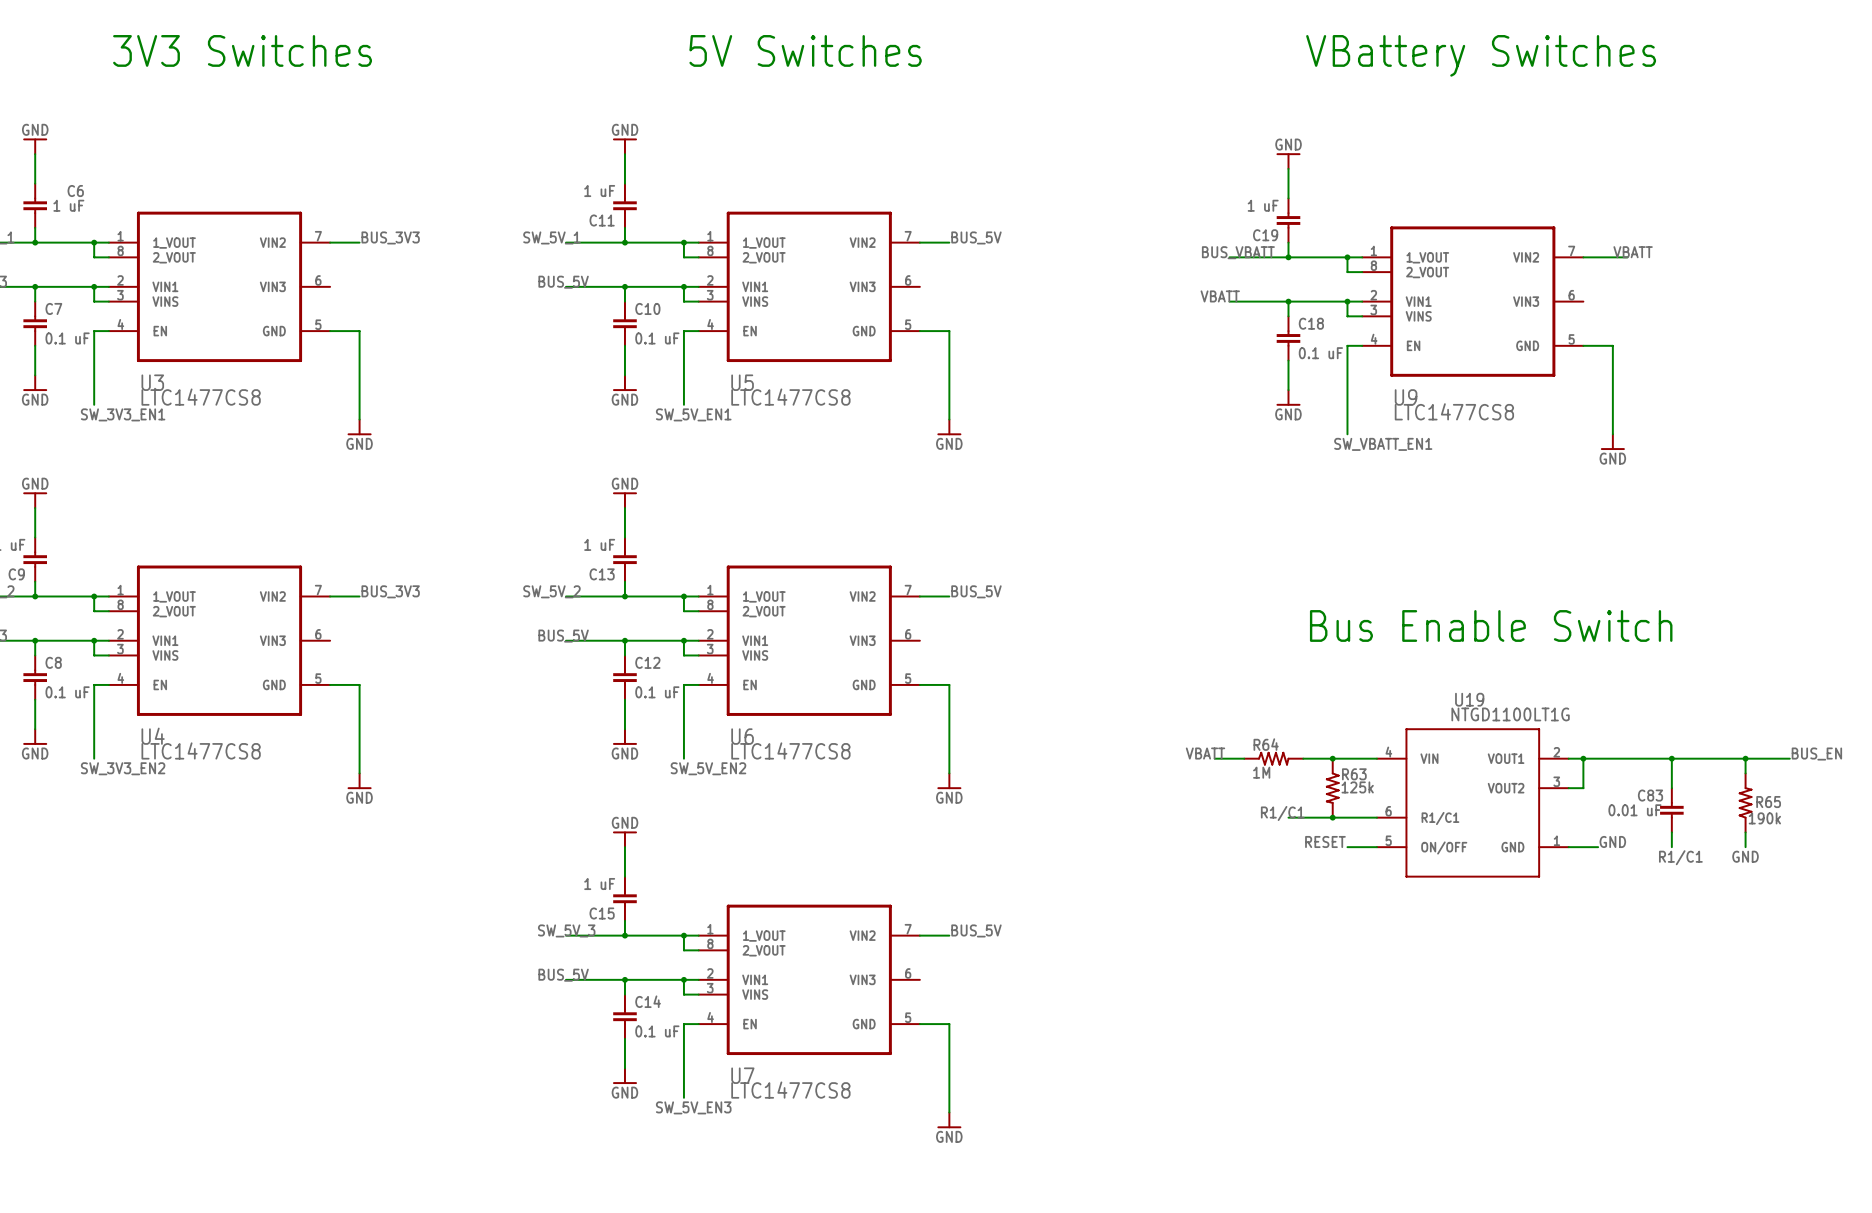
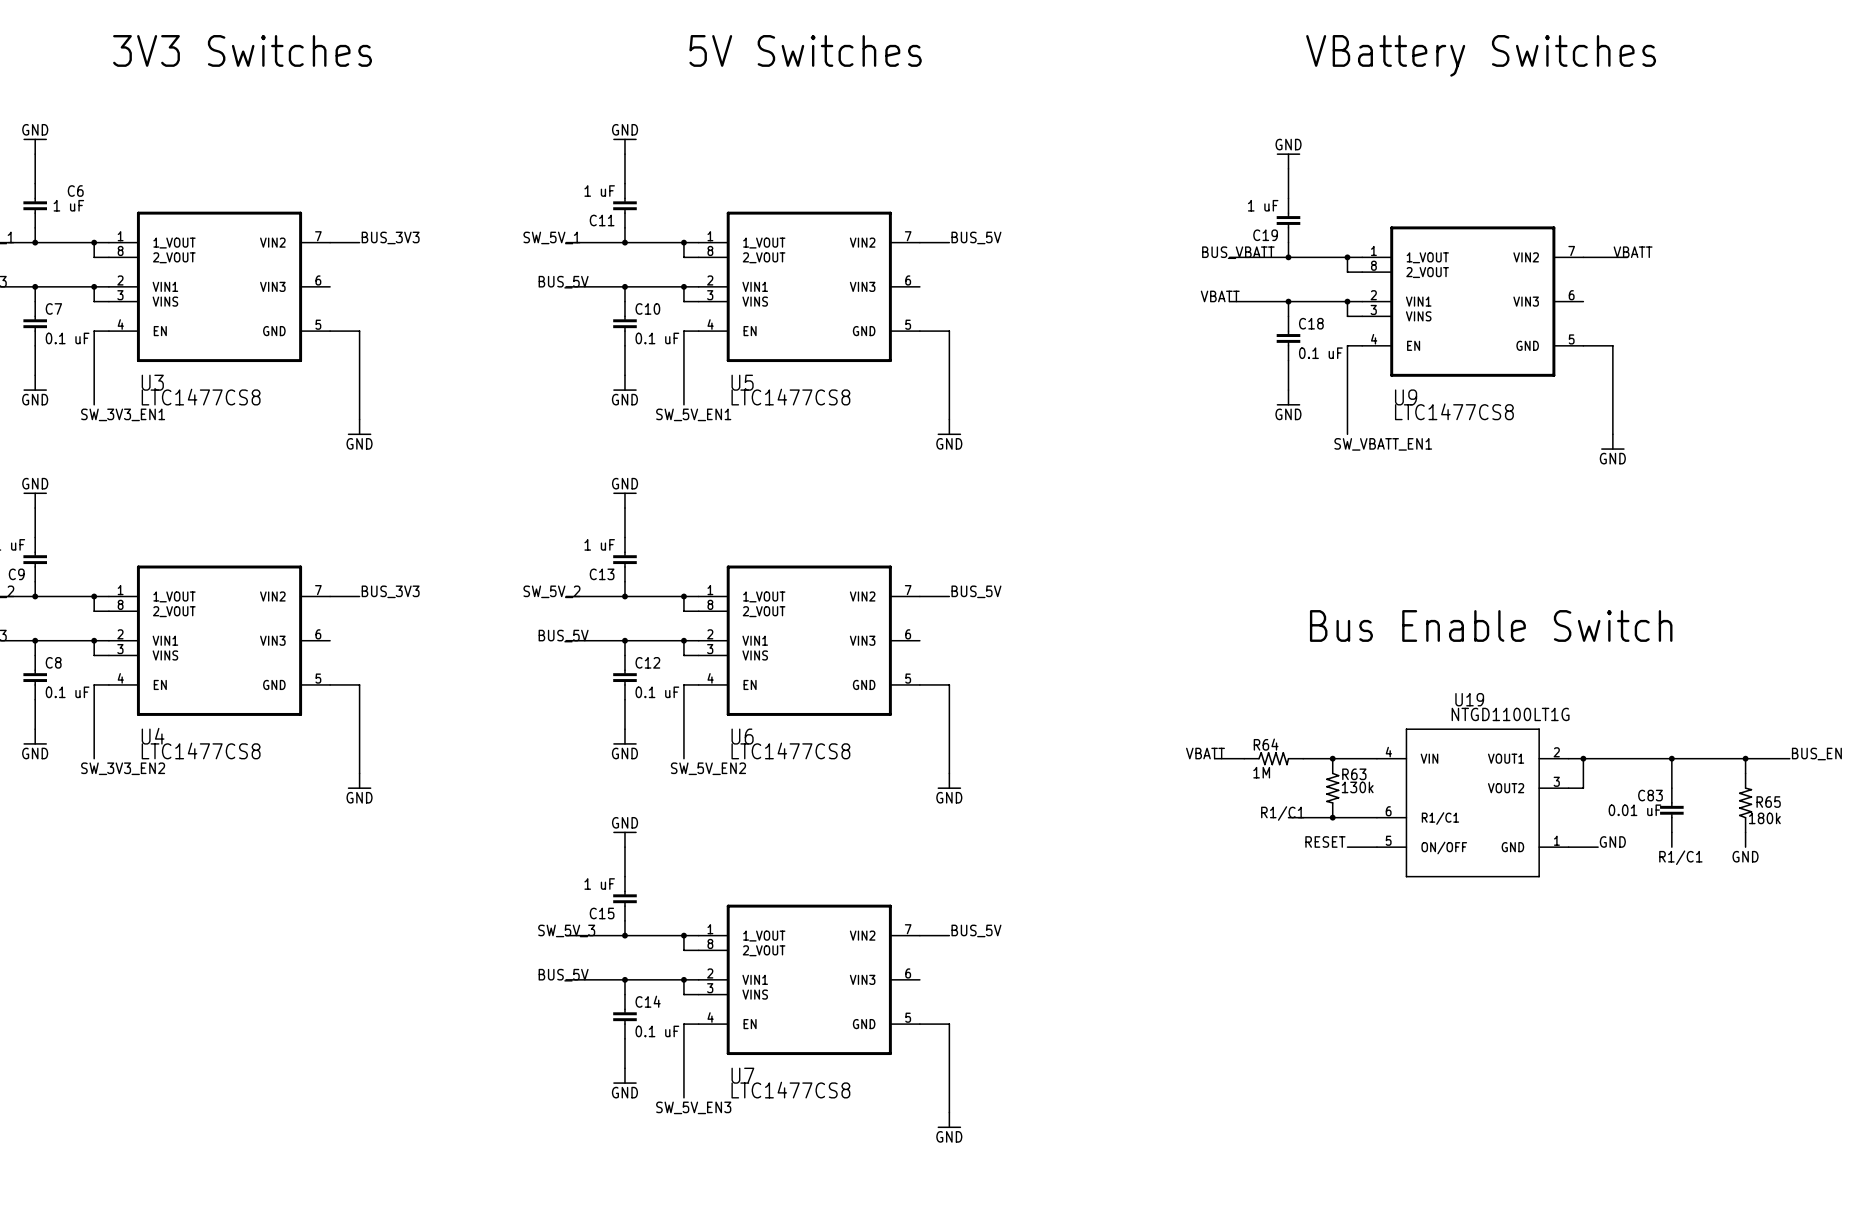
R63 value: 125k (1357, 787) -> 130k (1357, 787)
R65 value: 190k (1764, 818) -> 180k (1764, 818)

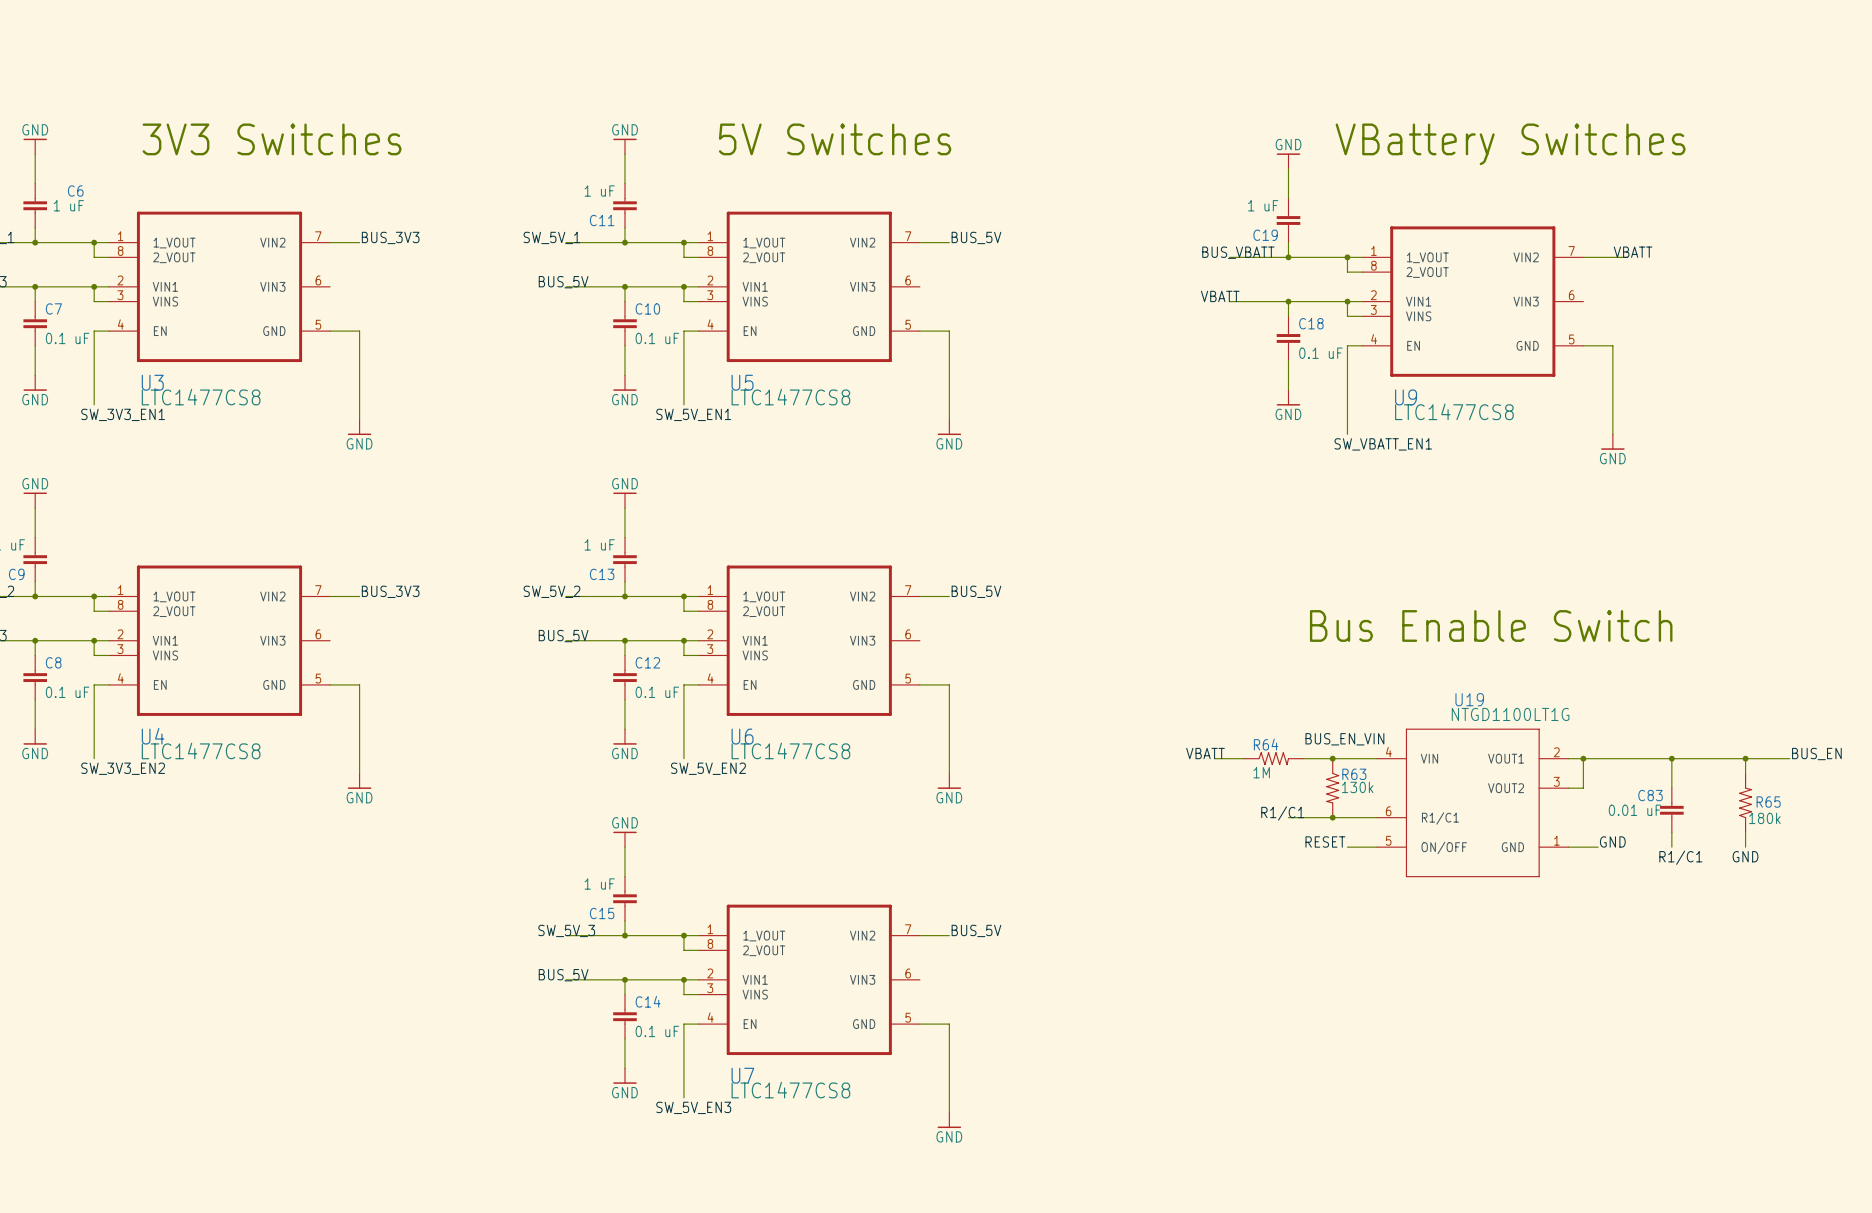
text position: 3V3 Switches (242, 50) -> 3V3 Switches (272, 139)
text position: 5V Switches (805, 50) -> 5V Switches (835, 139)
text position: VBattery Switches (1481, 55) -> VBattery Switches (1510, 144)
label: none -> BUS_EN_VIN (1344, 739)

